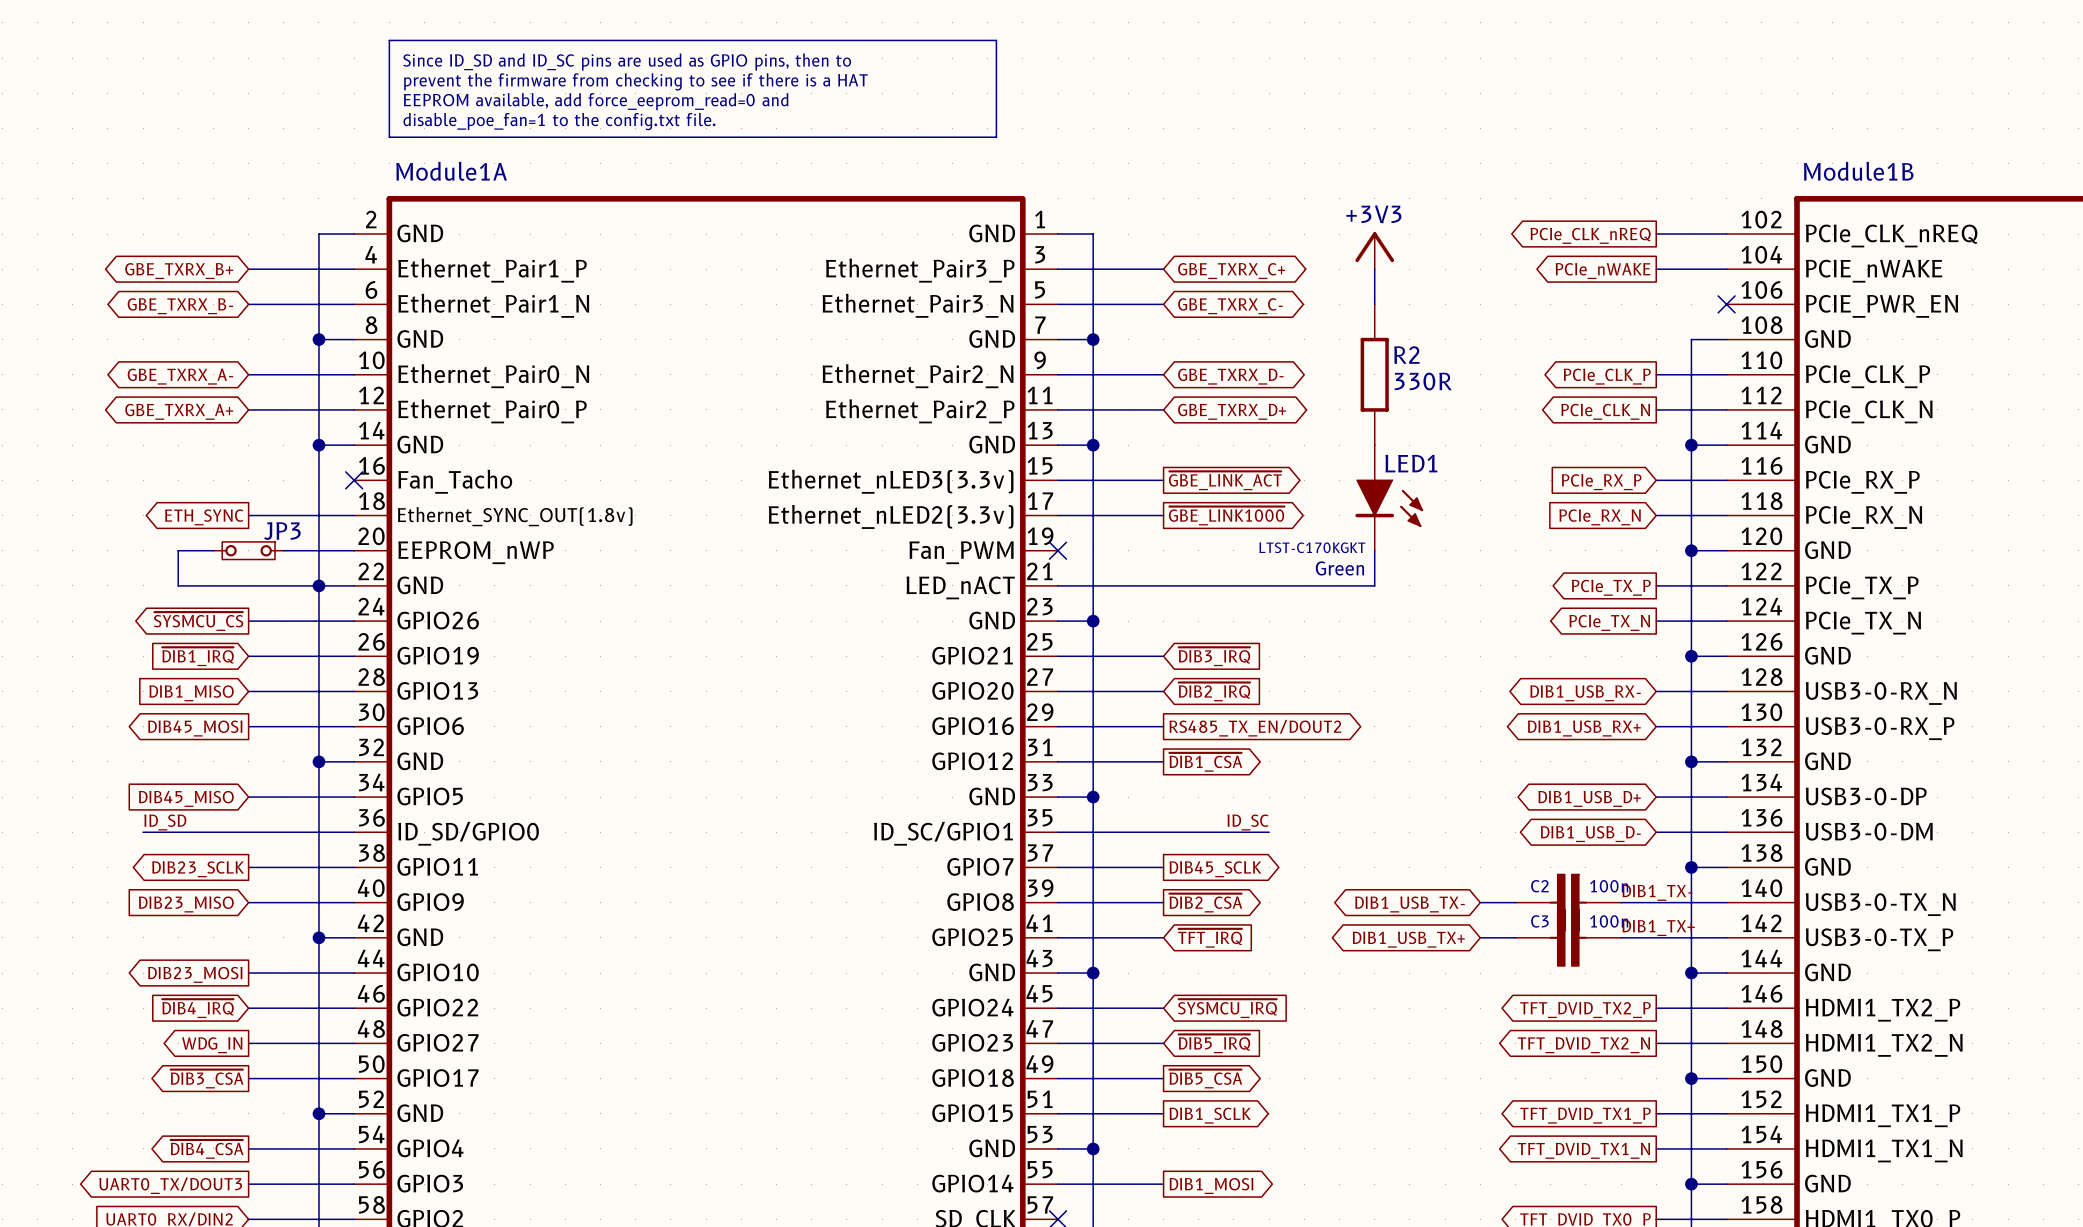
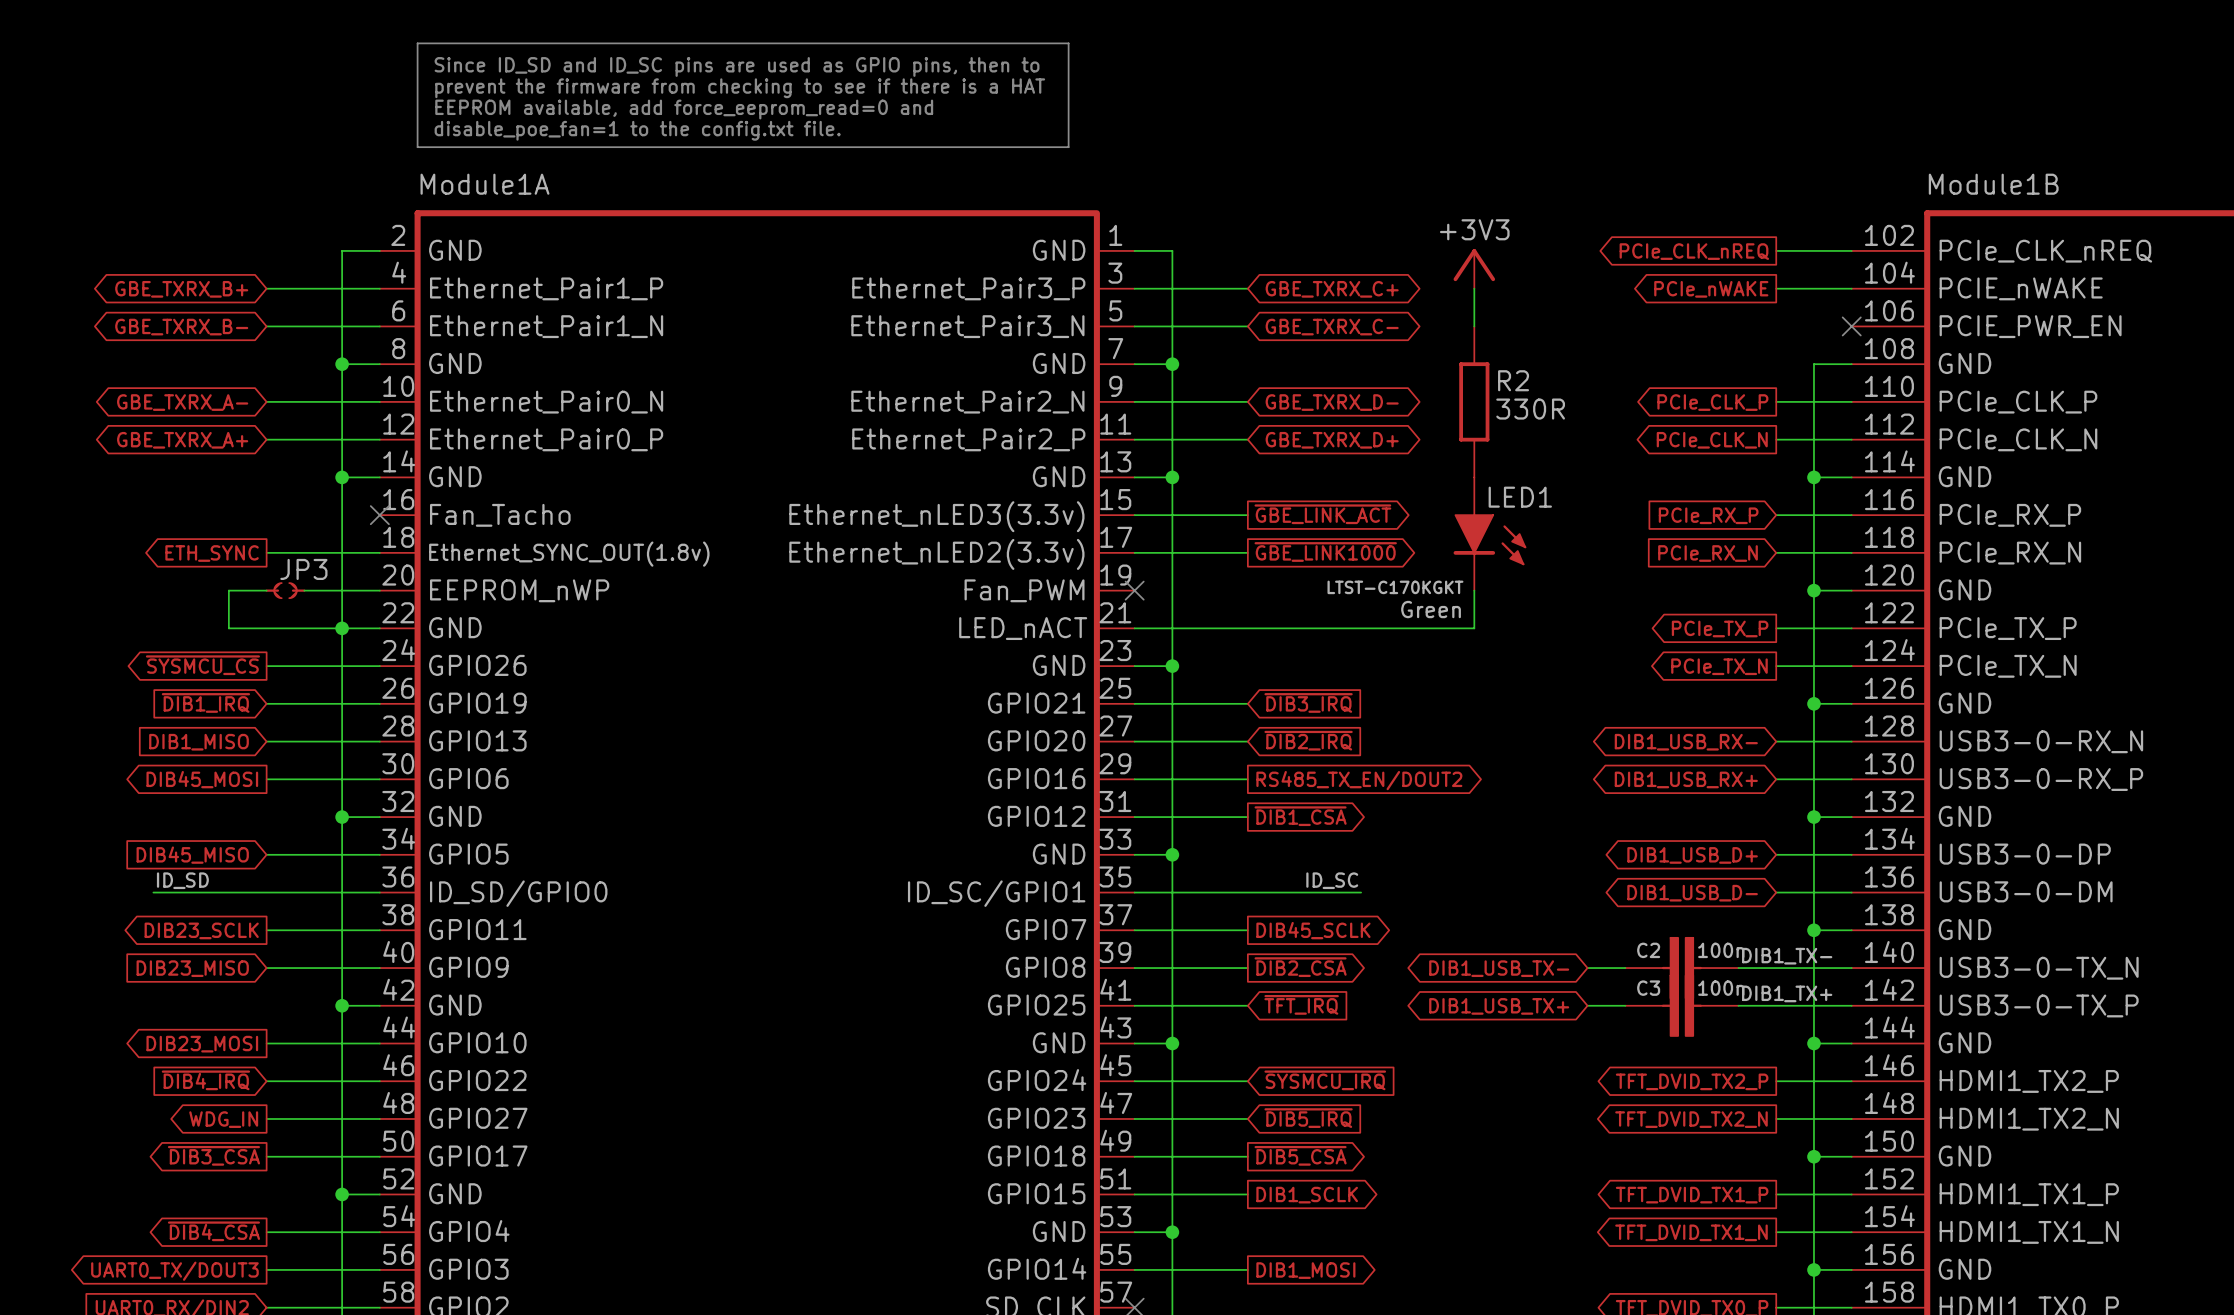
JP3 symbol: [213, 541, 284, 560] -> [265, 583, 306, 599]
wire: (213, 550) (178, 550) (178, 585) (213, 585) -> (266, 590) (228, 590) (228, 628)

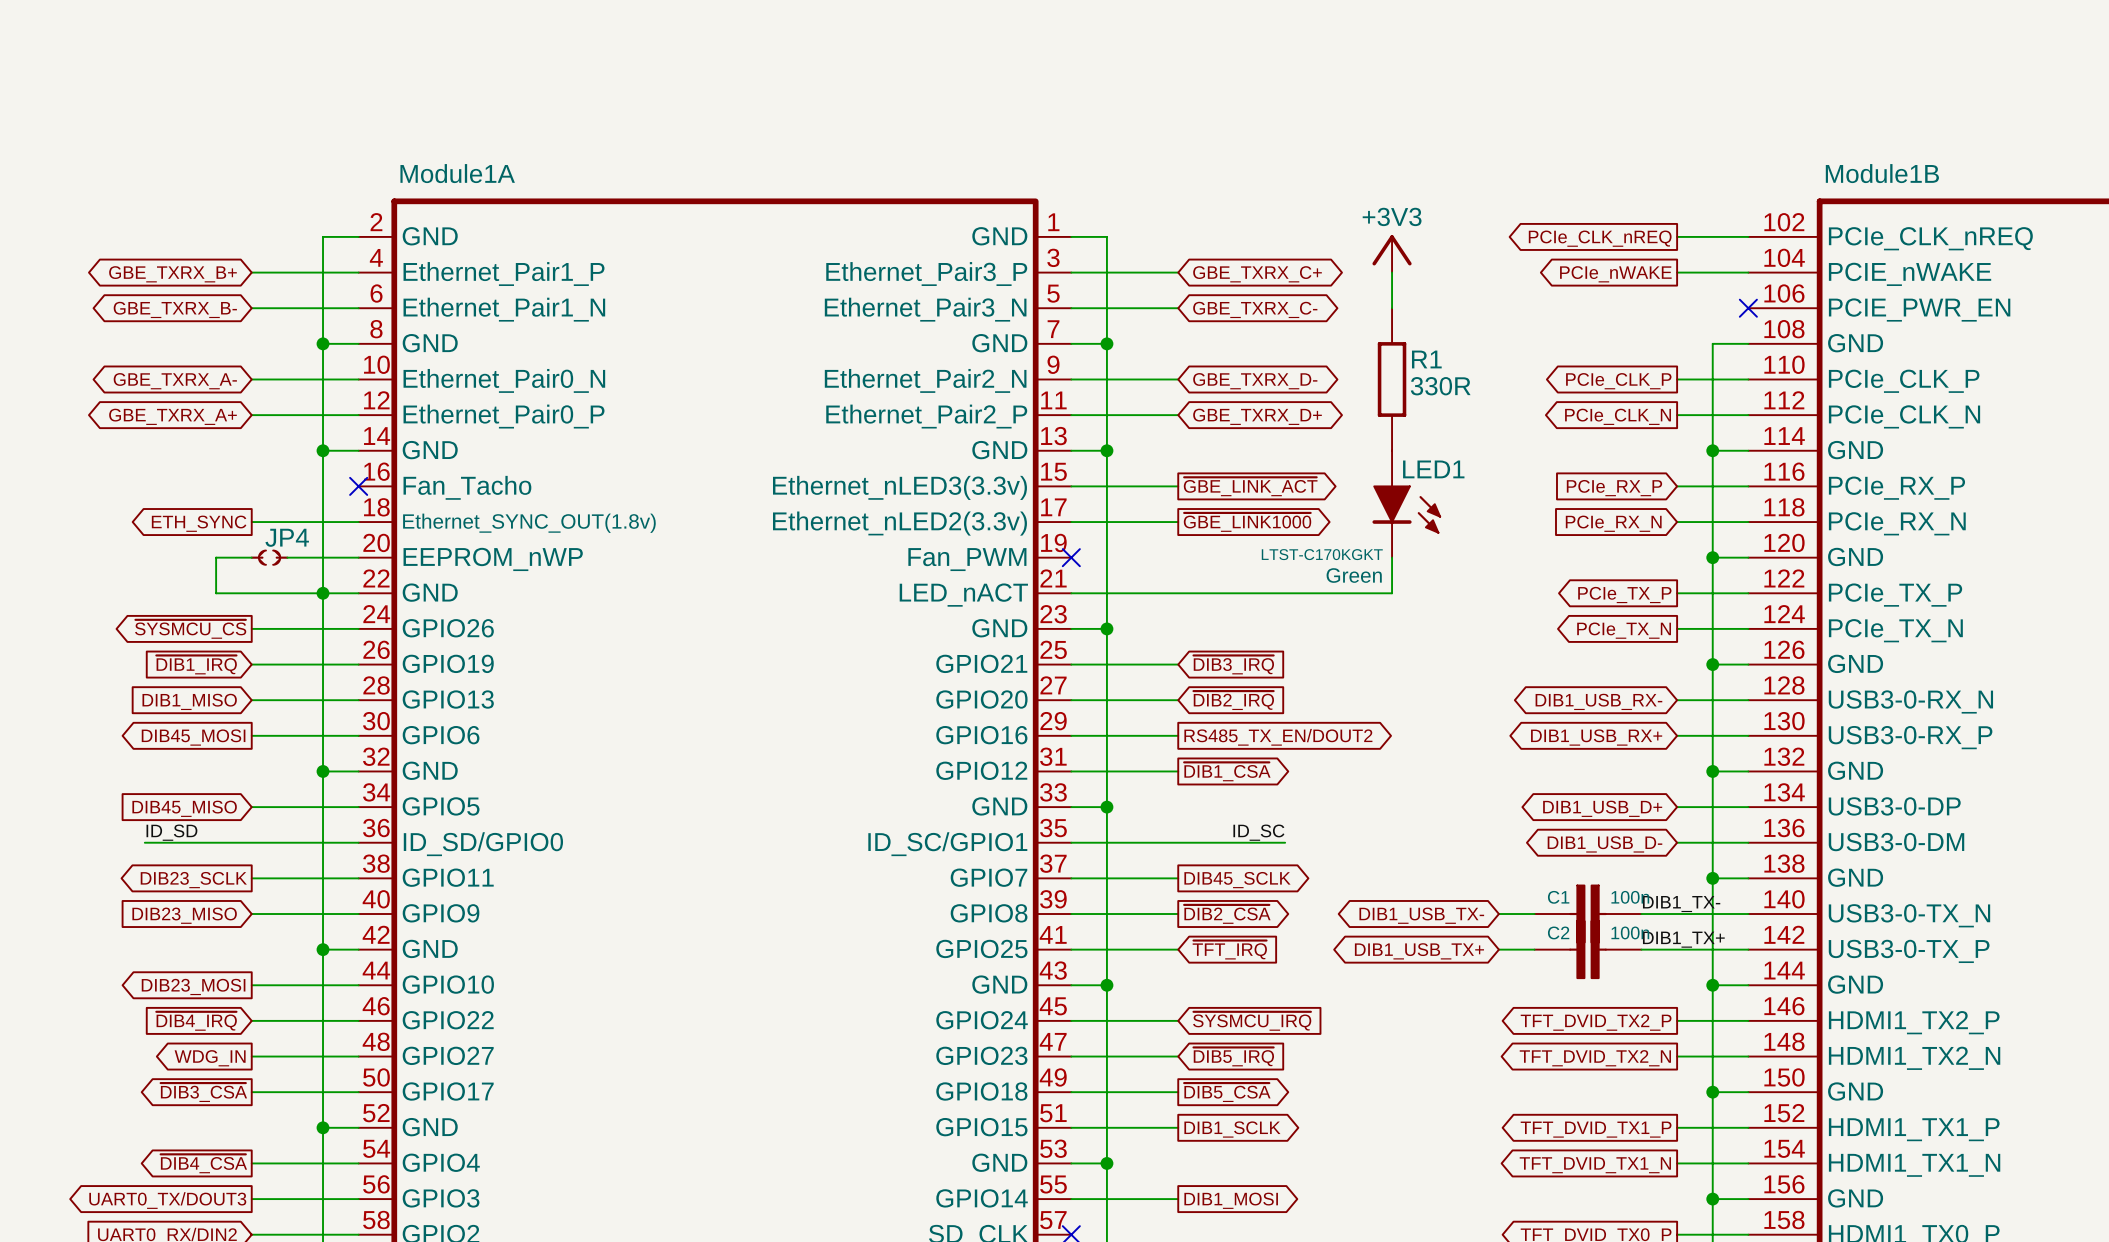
line: (417, 43) (1068, 43) (1068, 147) (417, 147) (417, 43) -> none
text: Since ID_SD and ID_SC pins are used as GPIO pins, then to (737, 66) -> none
text: prevent the firmware from checking to see if there is a HAT (740, 88) -> none
text: EEPROM available, add force_eeprom_read=0 and (684, 109) -> none
text: disable_poe_fan=1 to the config.txt file. (637, 130) -> none
R2 name: R2 (1513, 380) -> R1 (1426, 359)
JP3 name: JP3 (303, 569) -> JP4 (287, 537)
C2 name: C2 (1648, 950) -> C1 (1558, 897)
C3 name: C3 (1648, 988) -> C2 (1558, 932)

